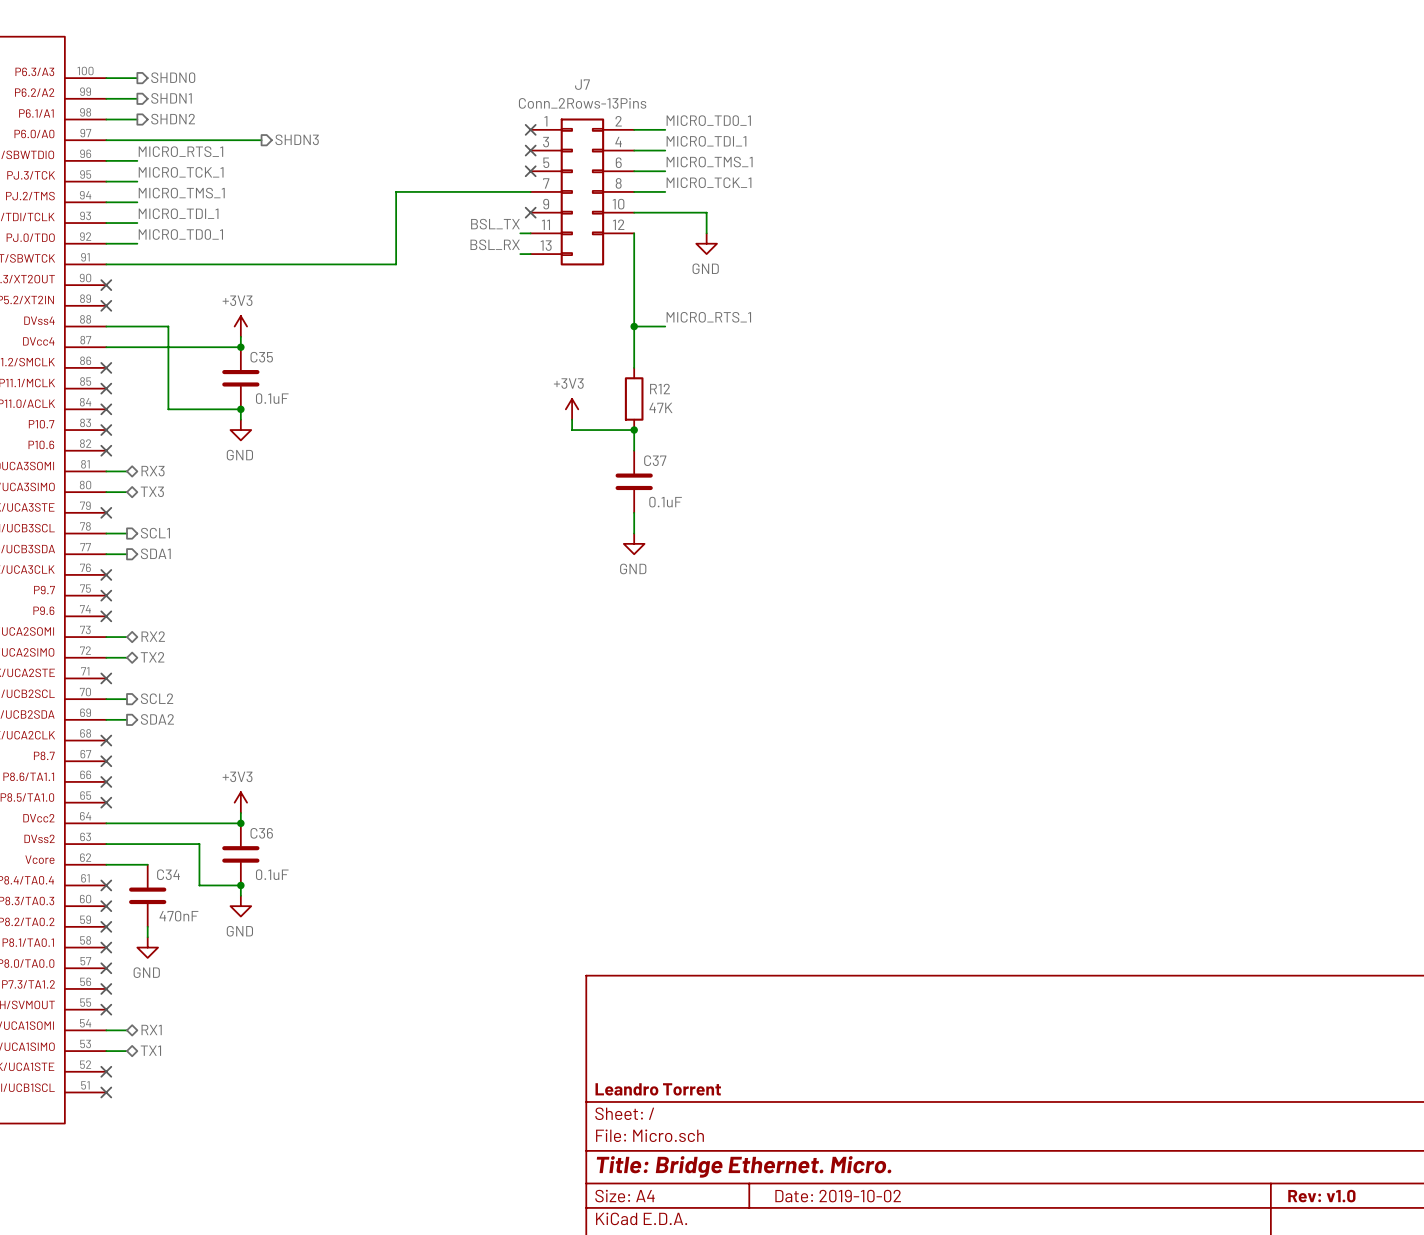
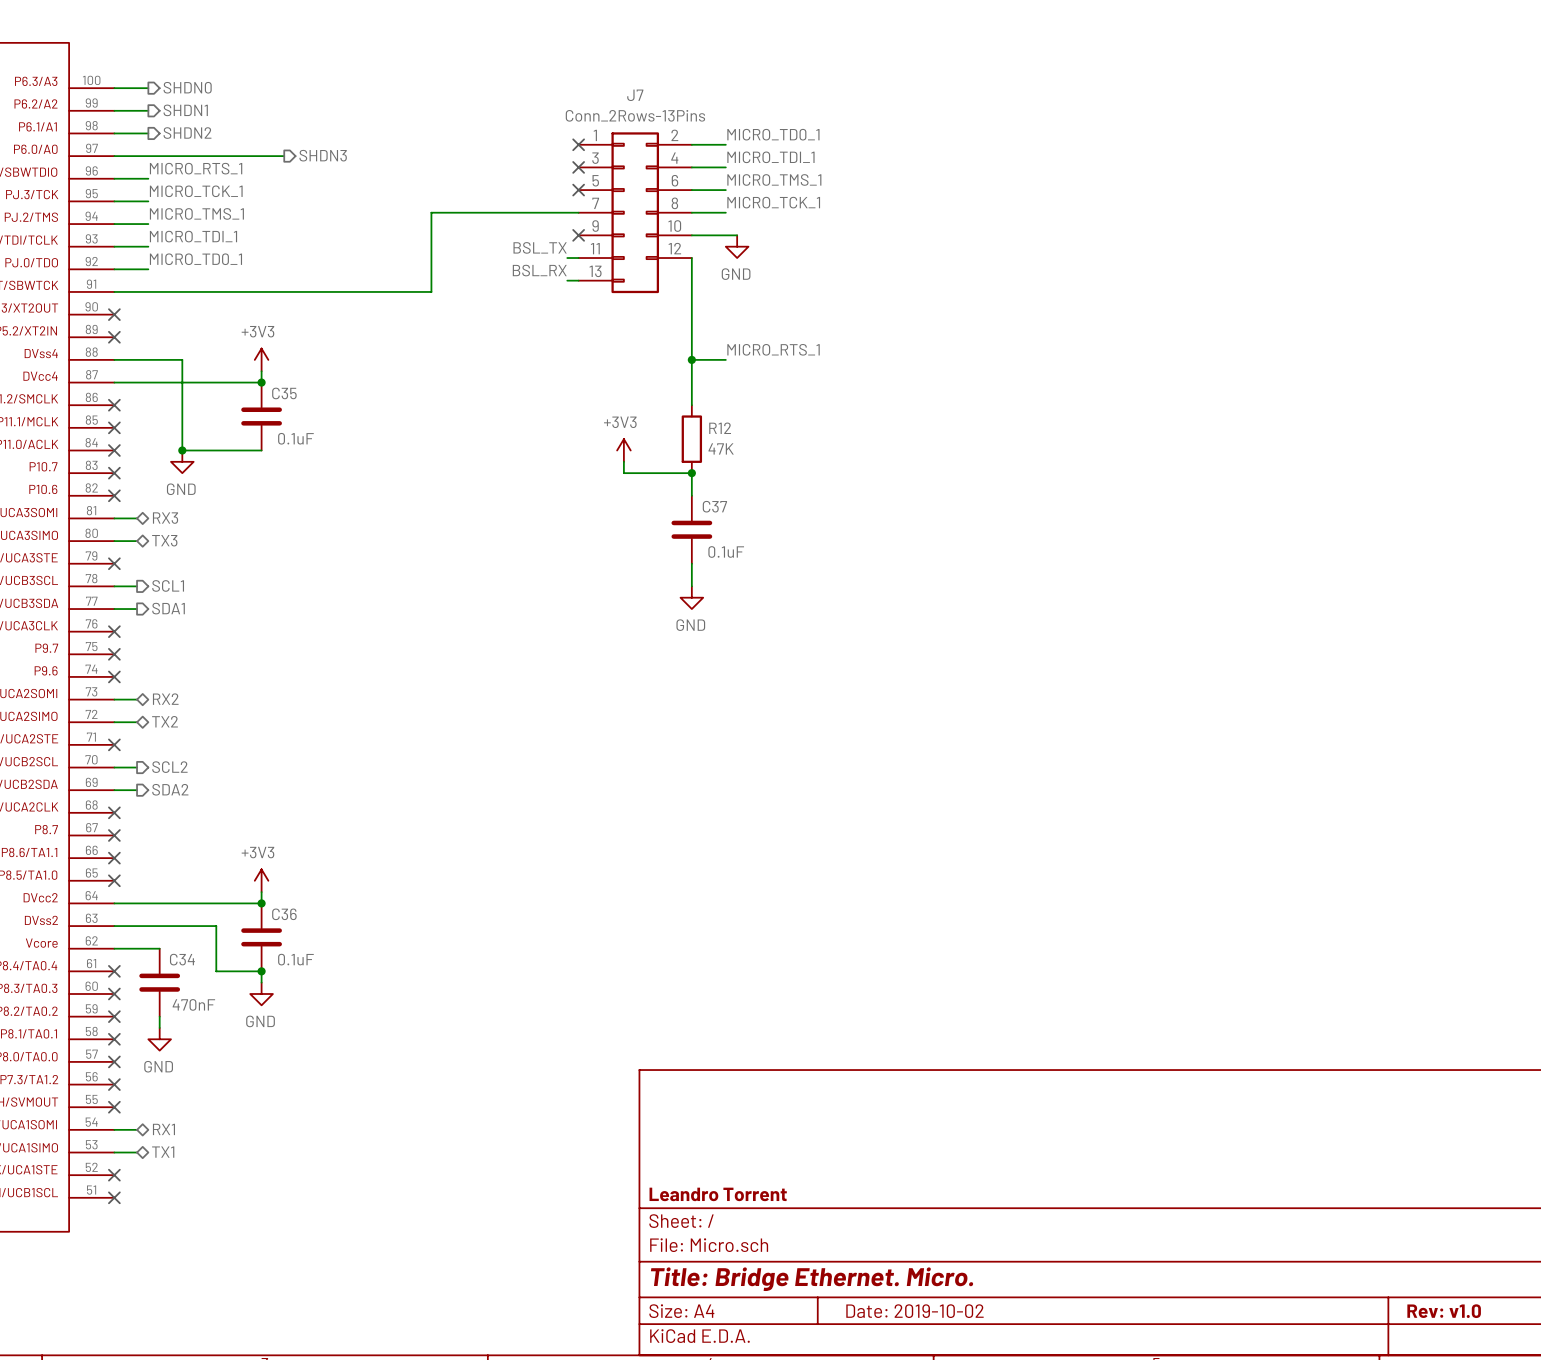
wire: (675, 212) (706, 212) (706, 233) -> none
power symbol position: GND (706, 243) -> GND (737, 246)
junction: none -> (182, 450)
wire: (240, 409) (240, 419) -> none
junction: (240, 409) -> none
power symbol position: GND (240, 430) -> GND (182, 461)

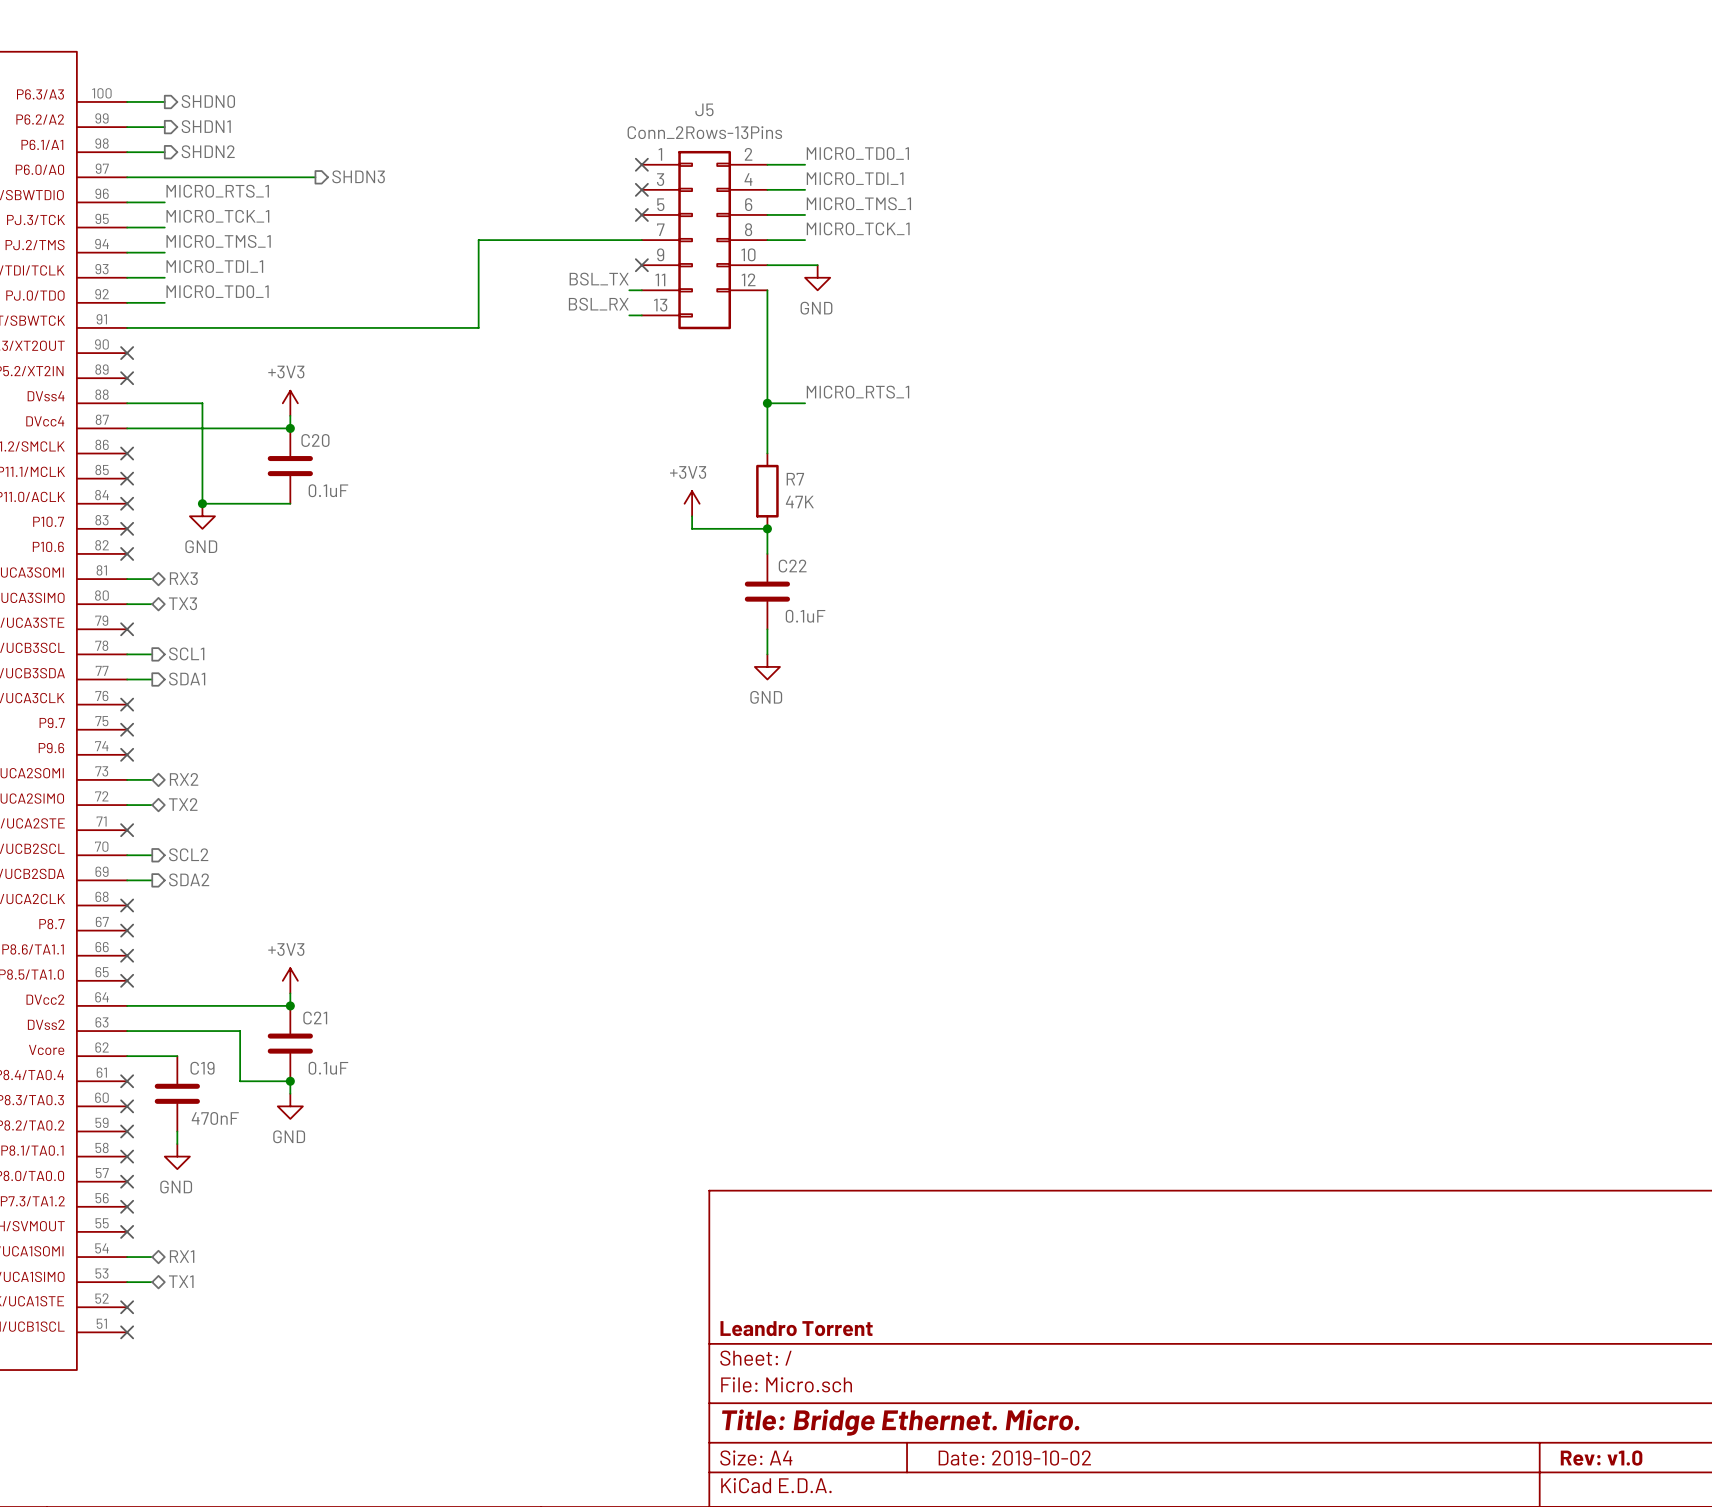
J7 name: J7 (635, 95) -> J5 (704, 109)
C35 name: C35 (284, 393) -> C20 (315, 440)
R12 name: R12 (720, 428) -> R7 (795, 479)
C37 name: C37 (714, 506) -> C22 (792, 566)
C36 name: C36 (284, 914) -> C21 (315, 1018)
C34 name: C34 (182, 959) -> C19 (202, 1068)

